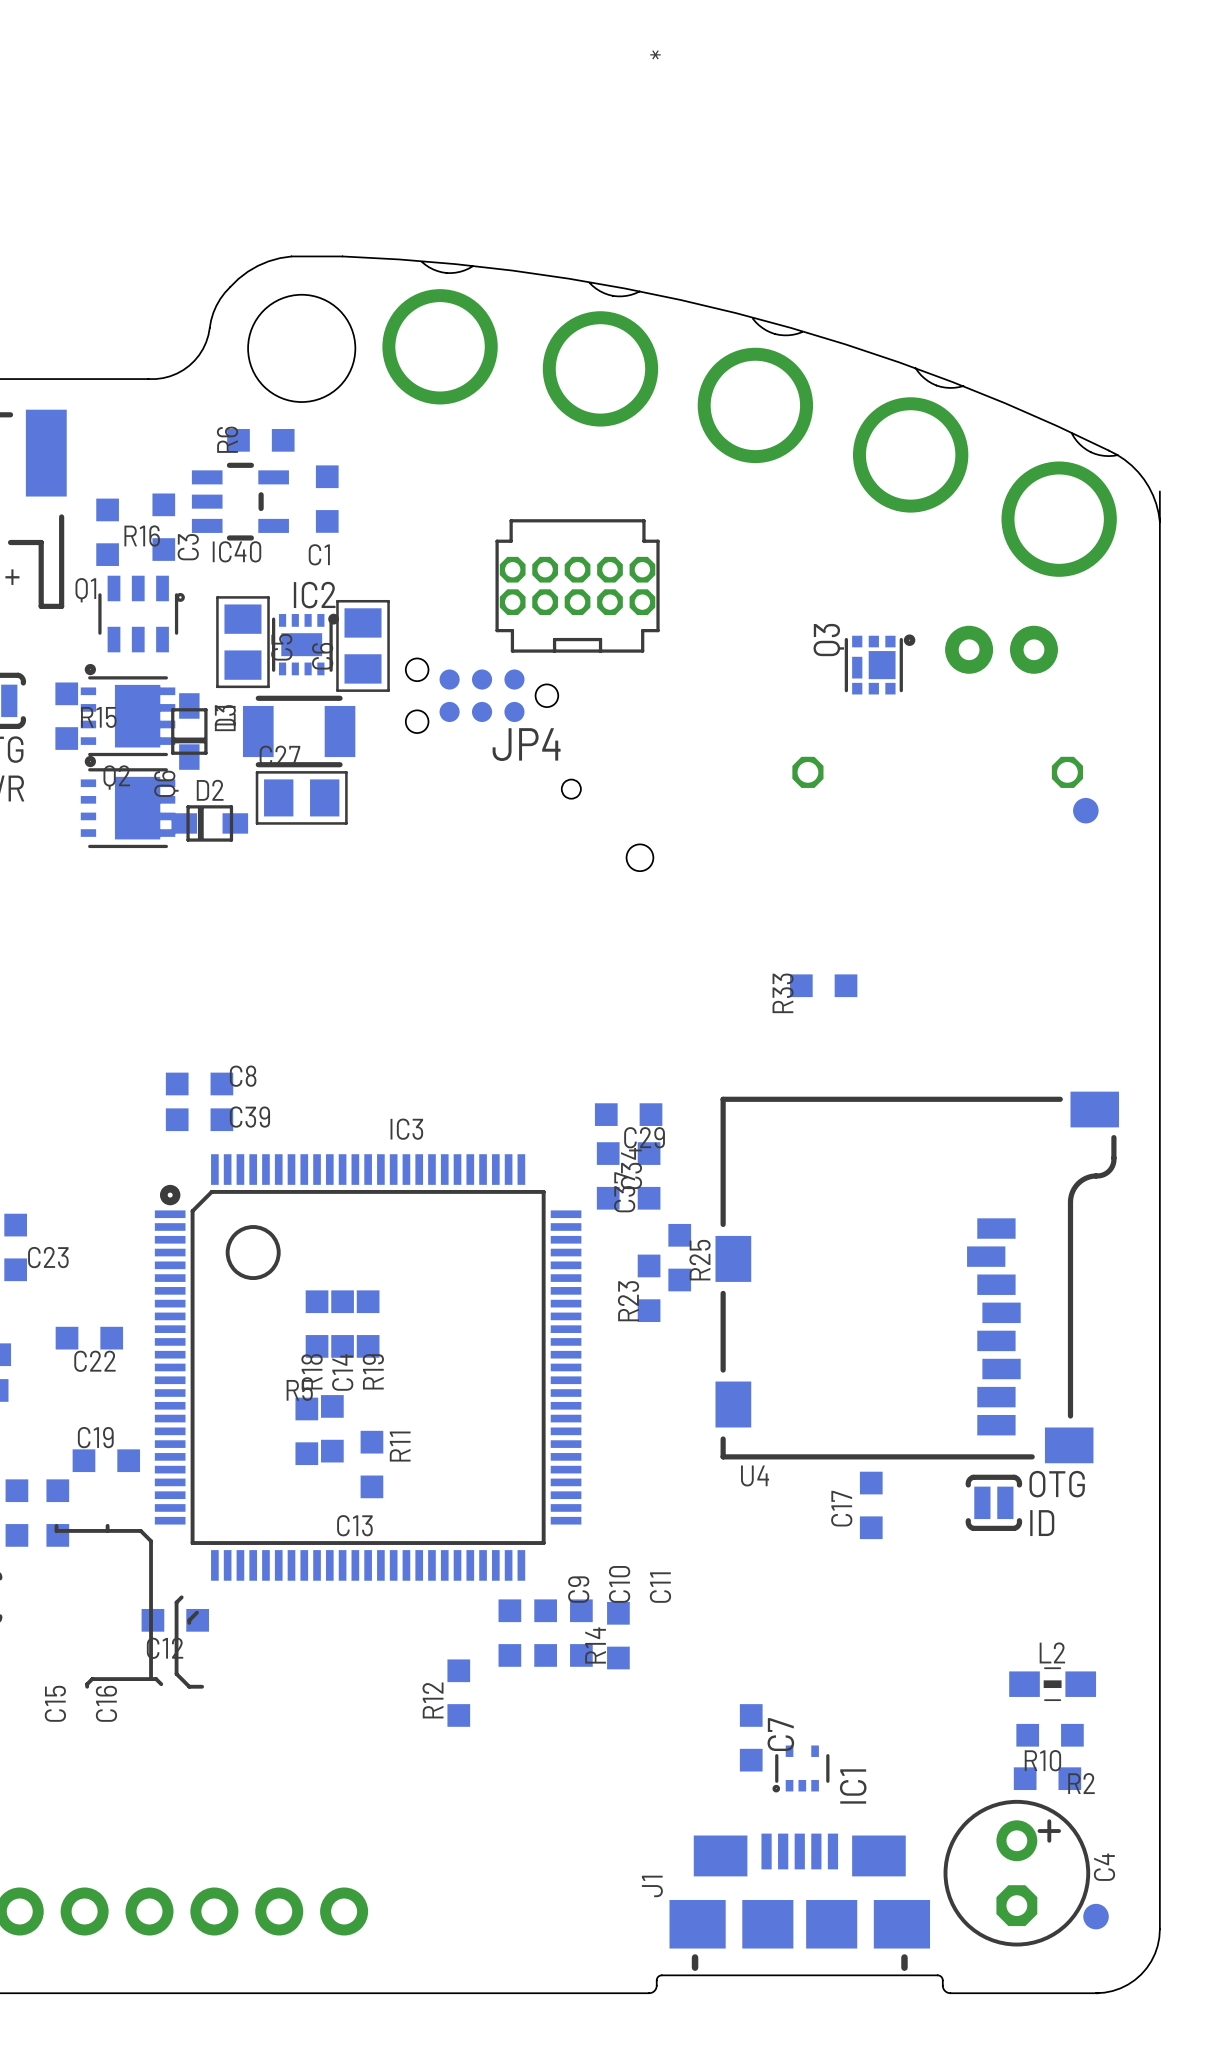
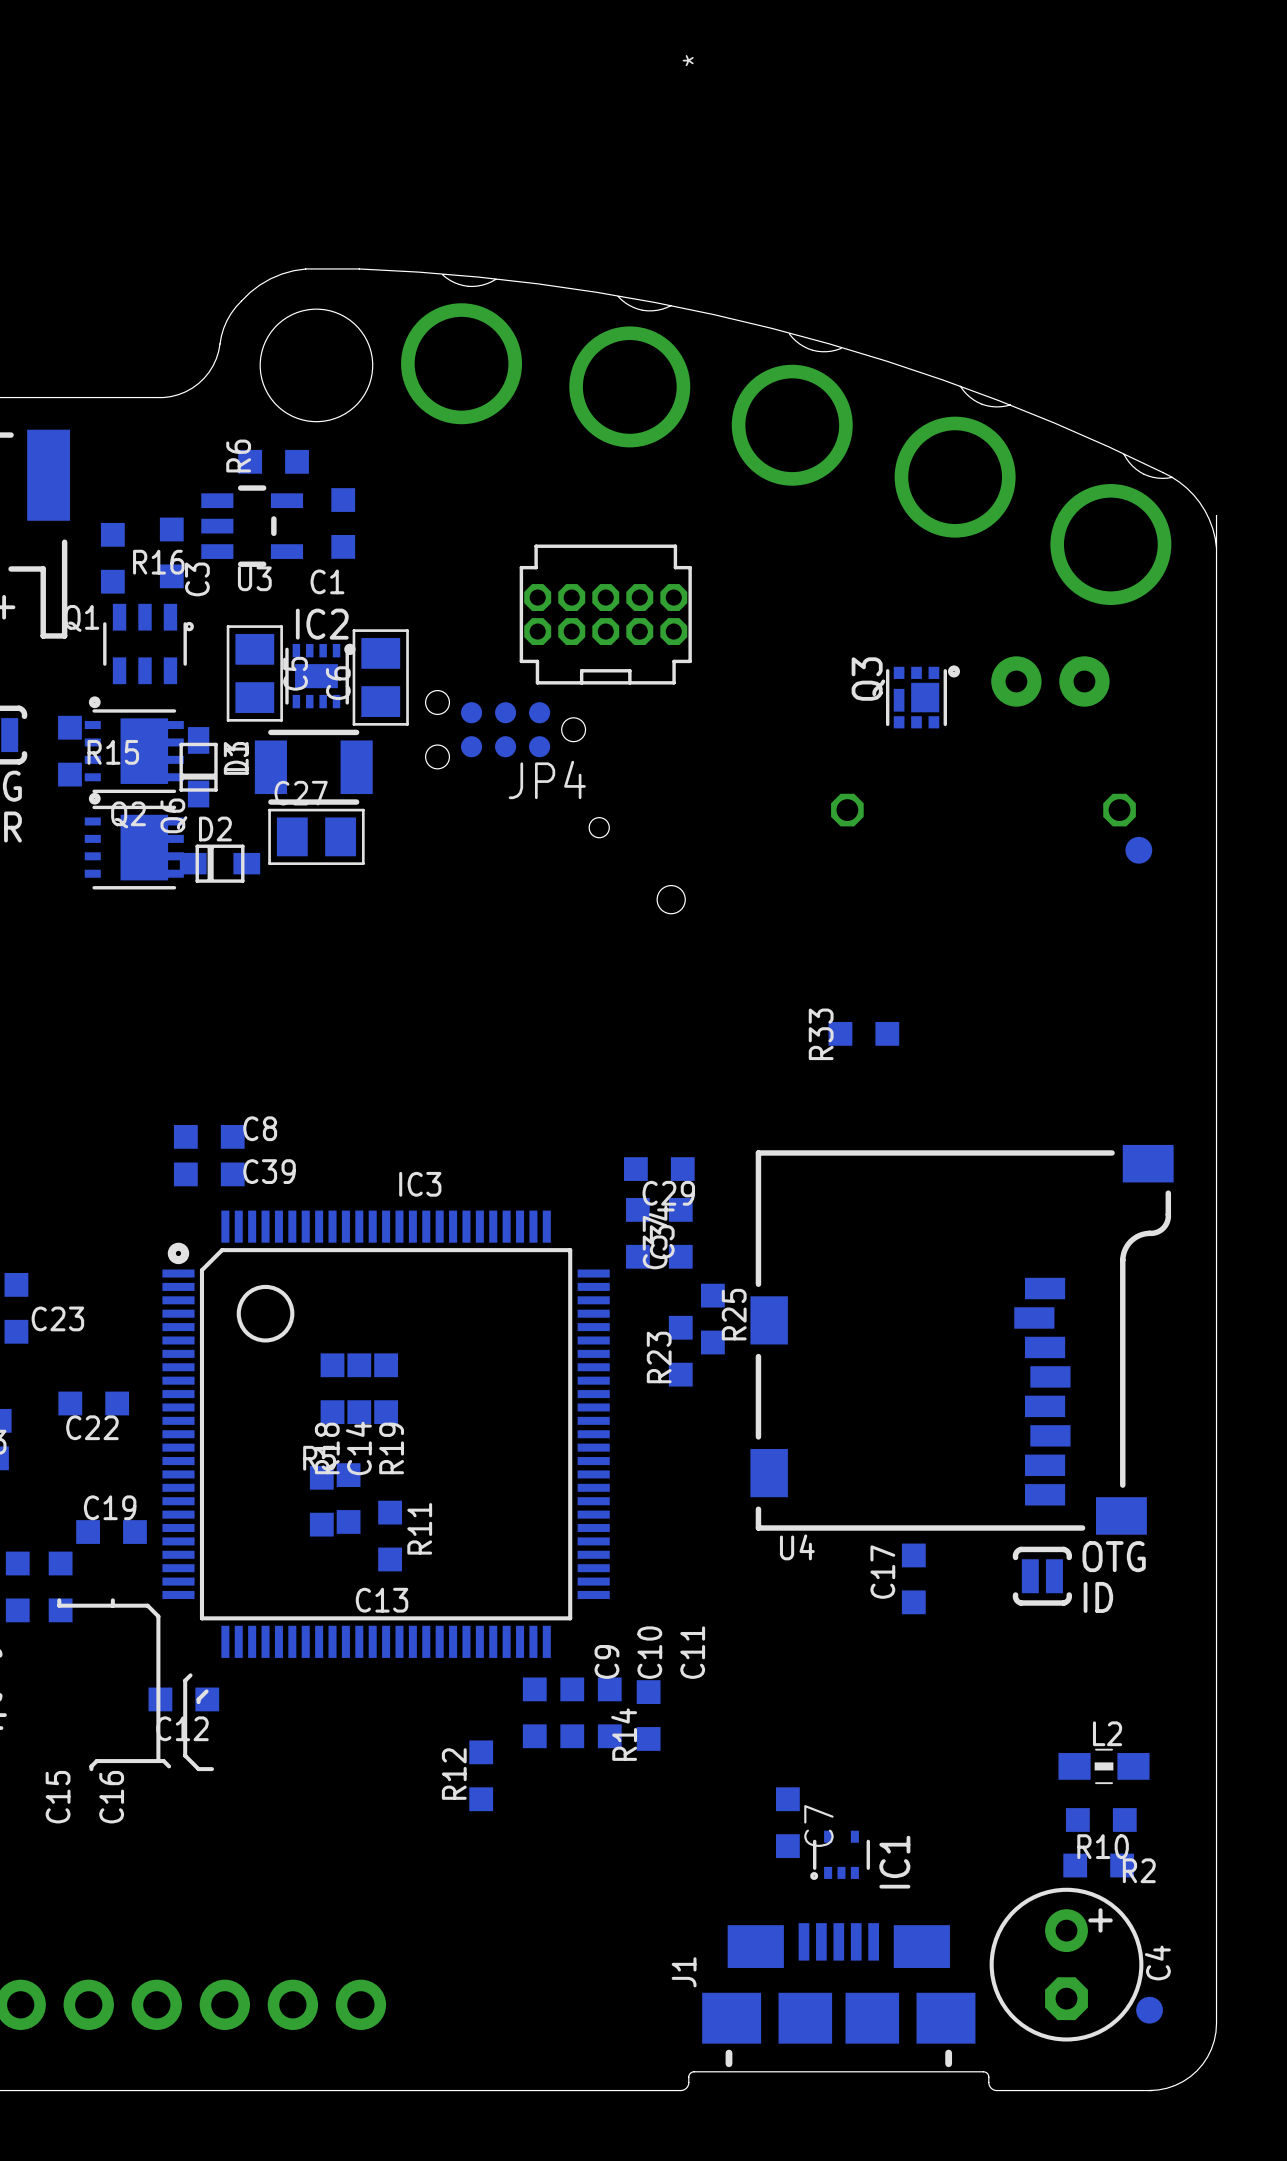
IC40 name: IC40 (236, 551) -> U3 (254, 578)

